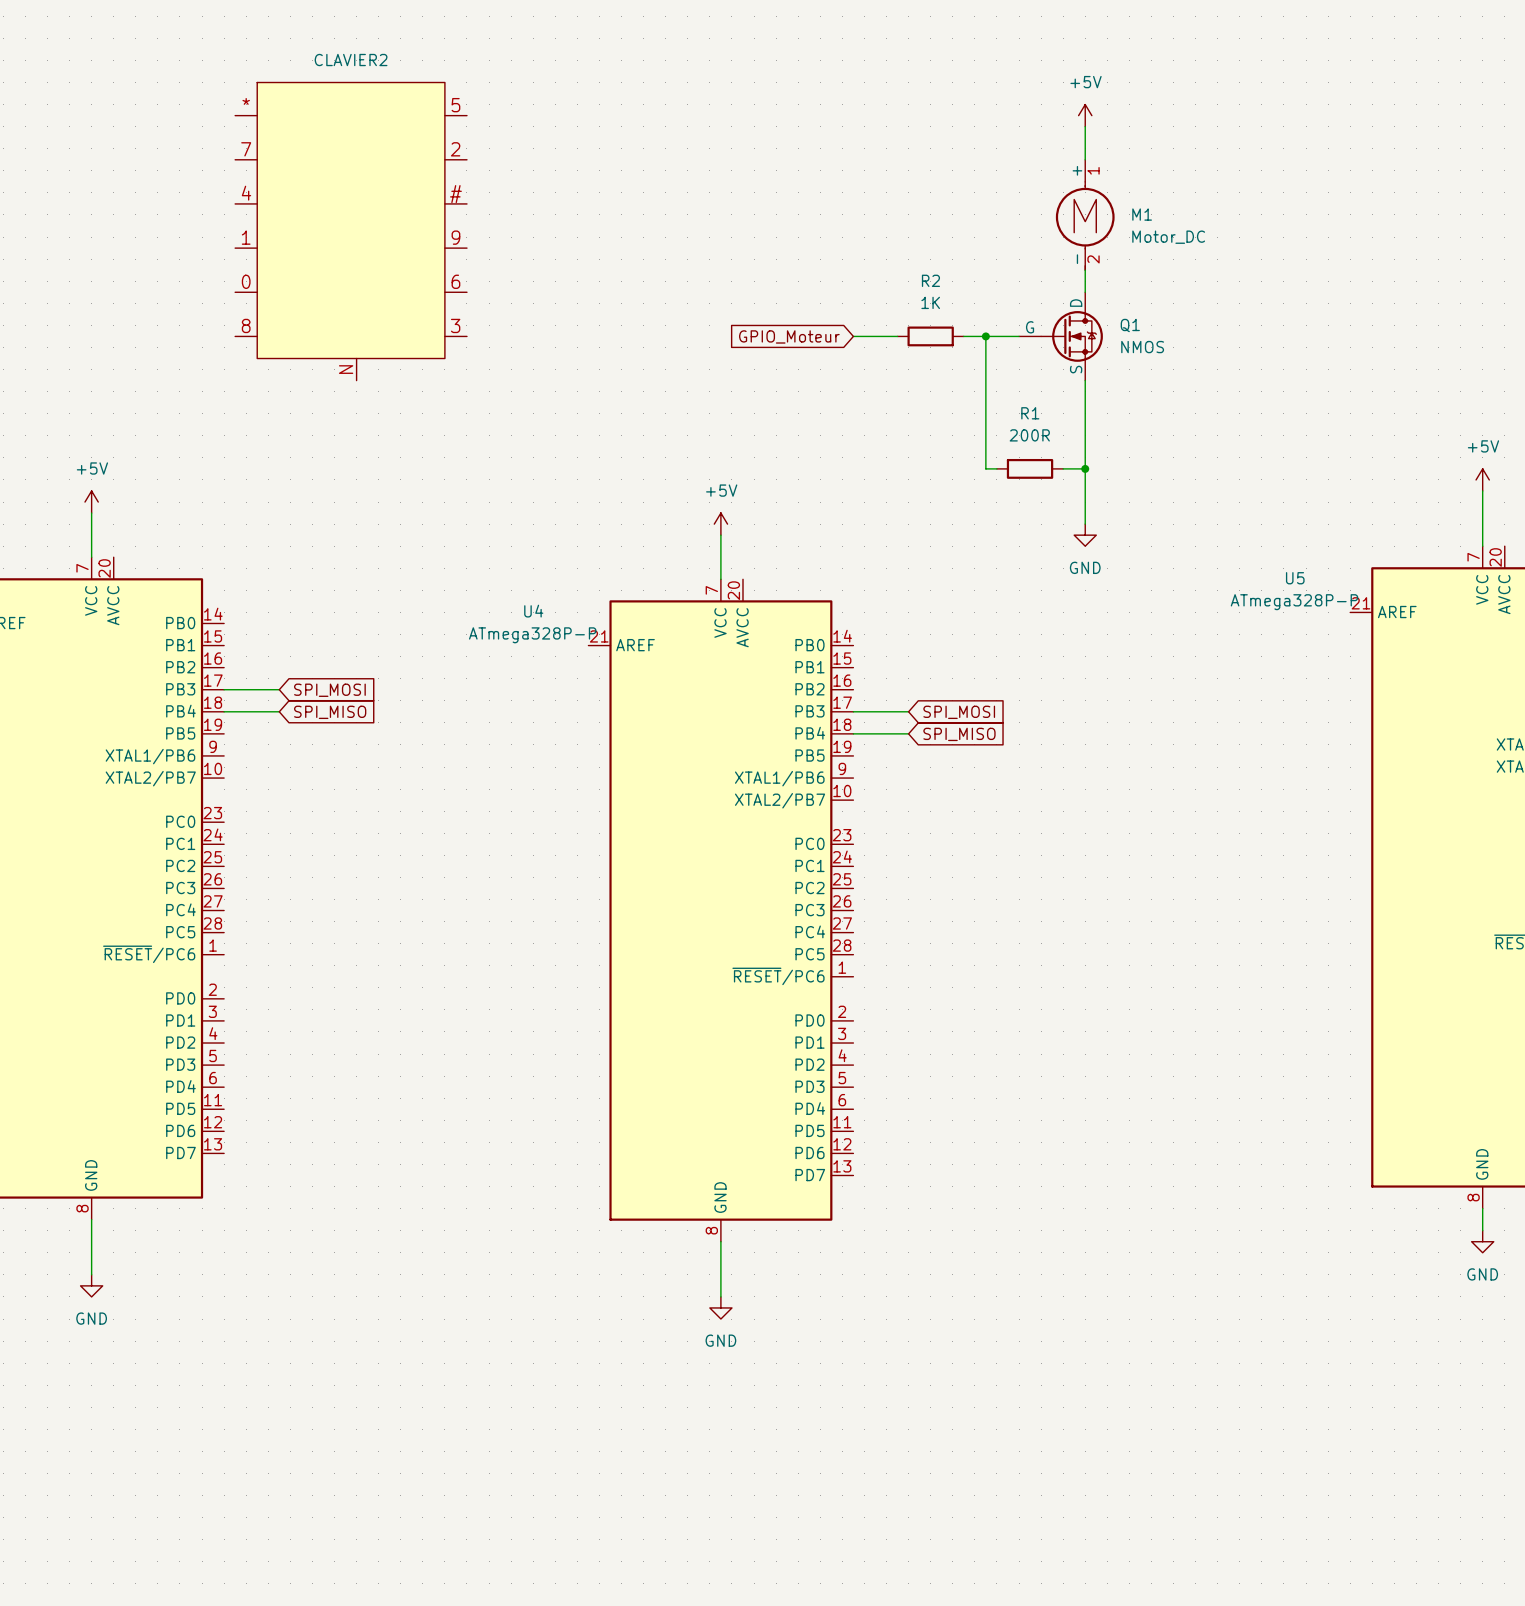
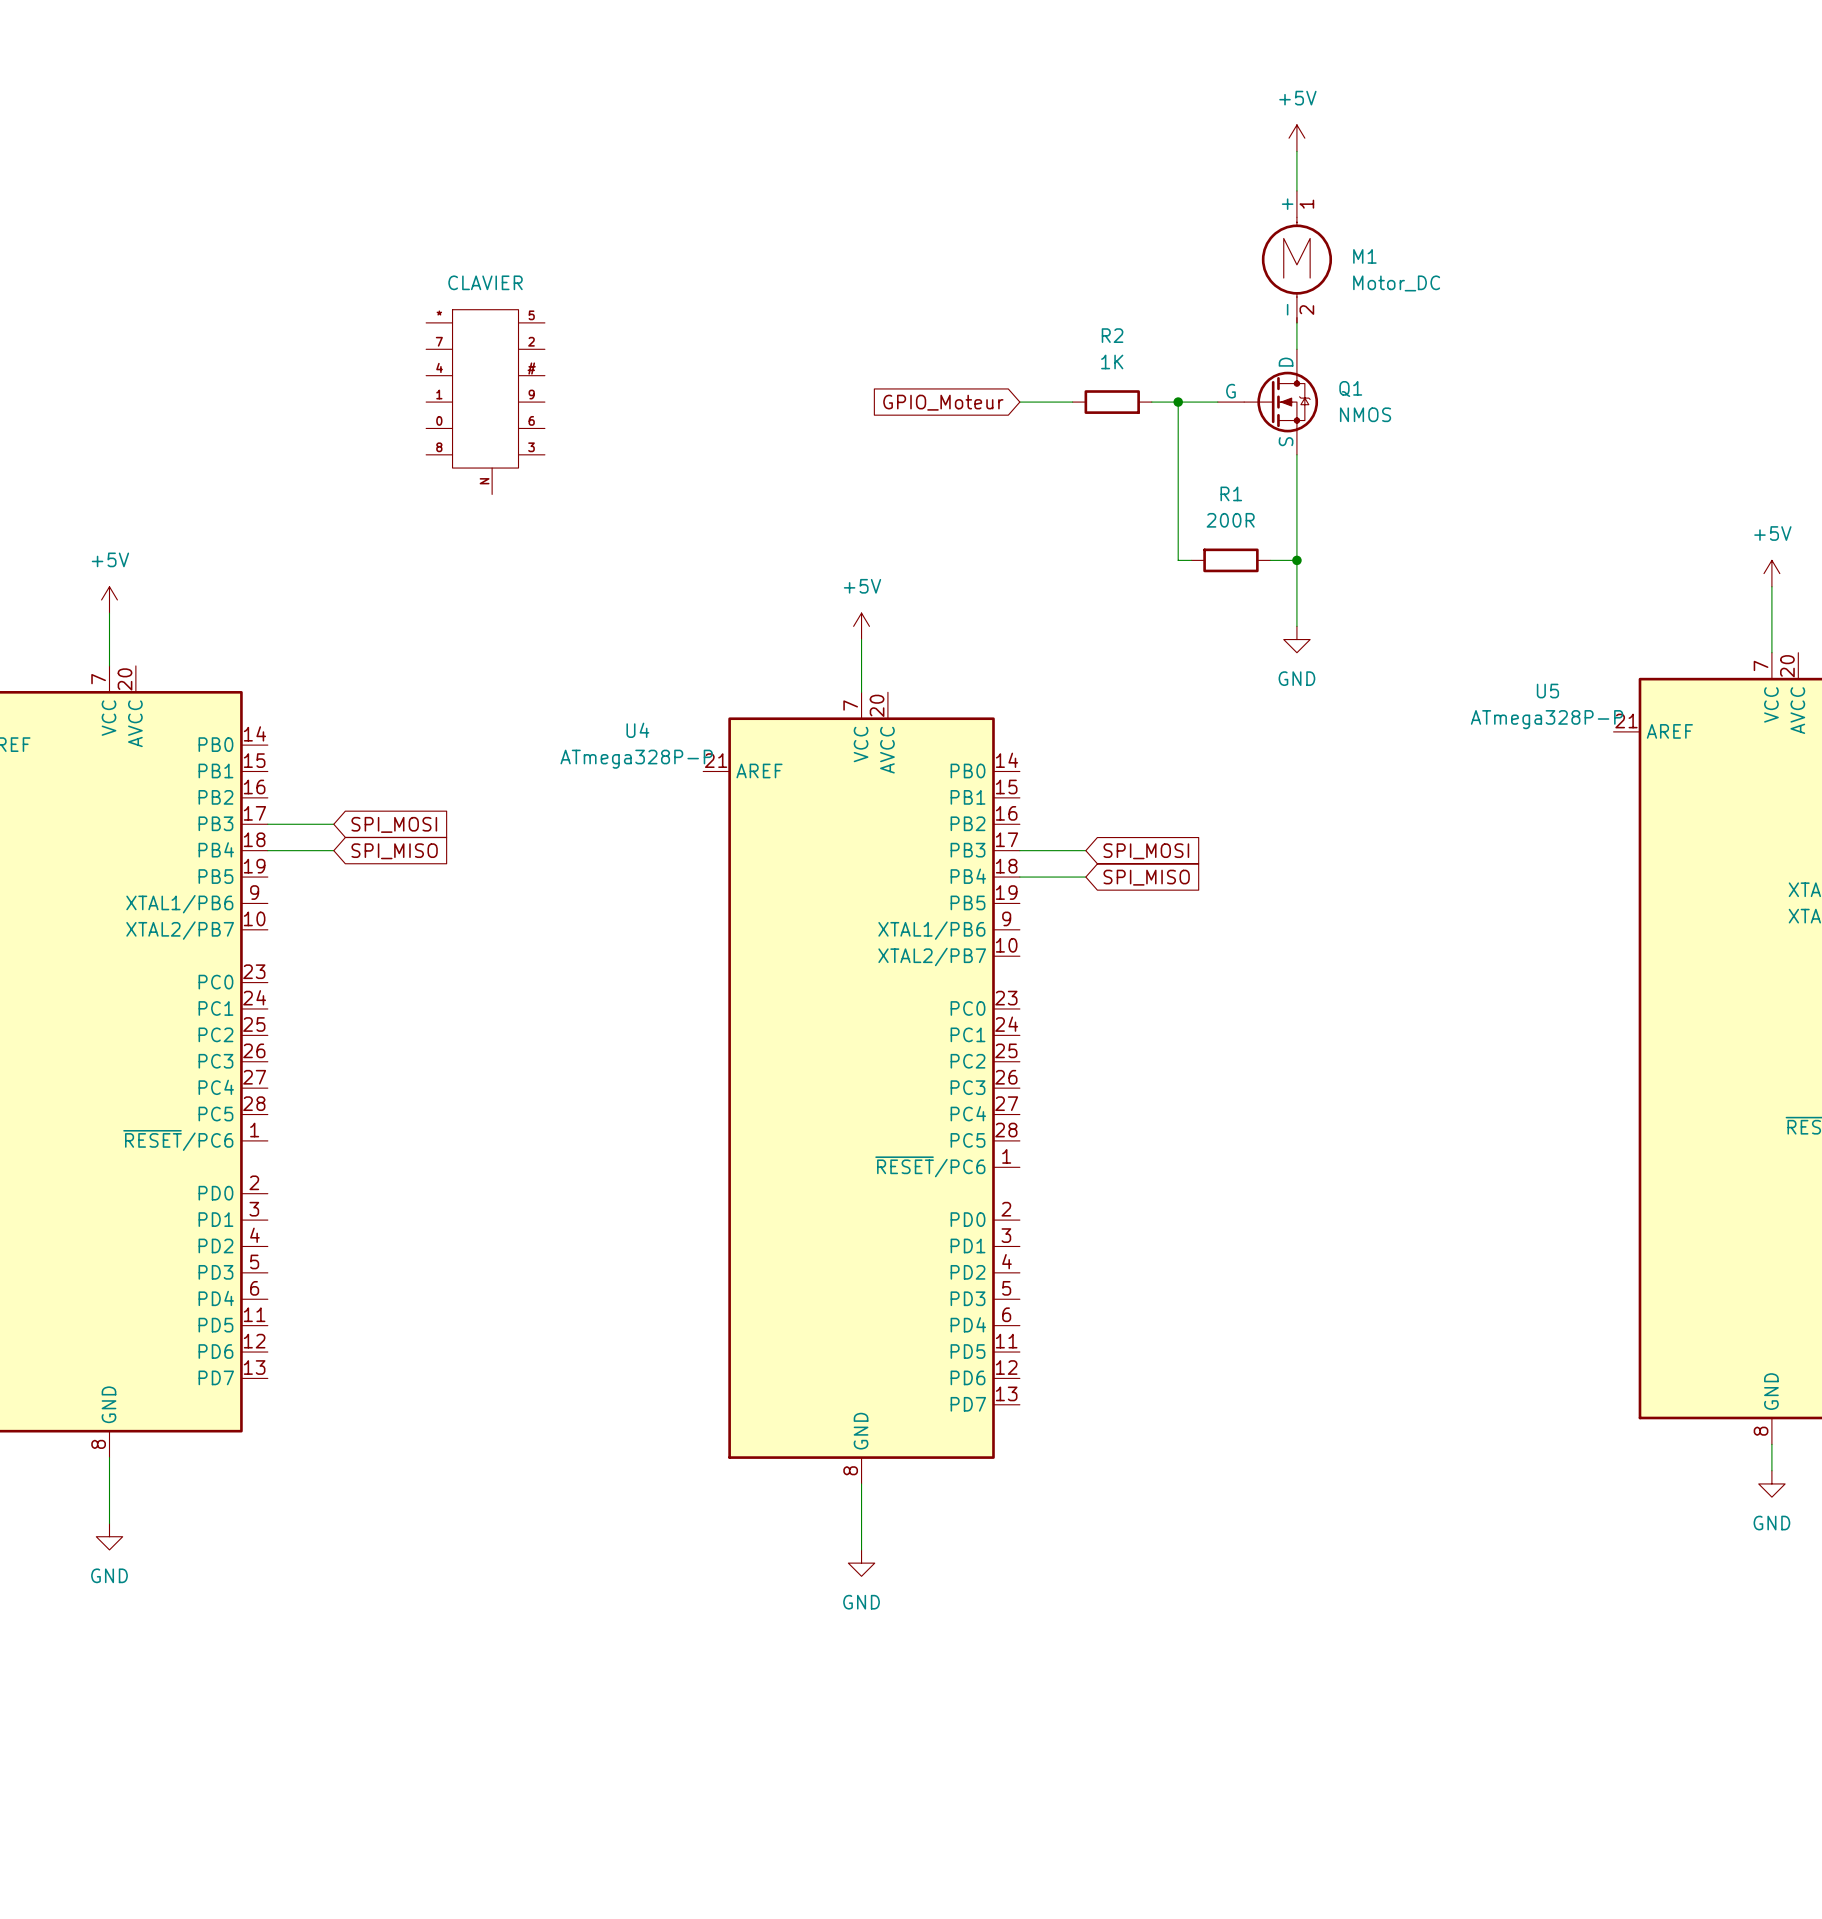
CLAVIER2: (351, 231) -> none
CLAVIER: none -> (485, 402)

